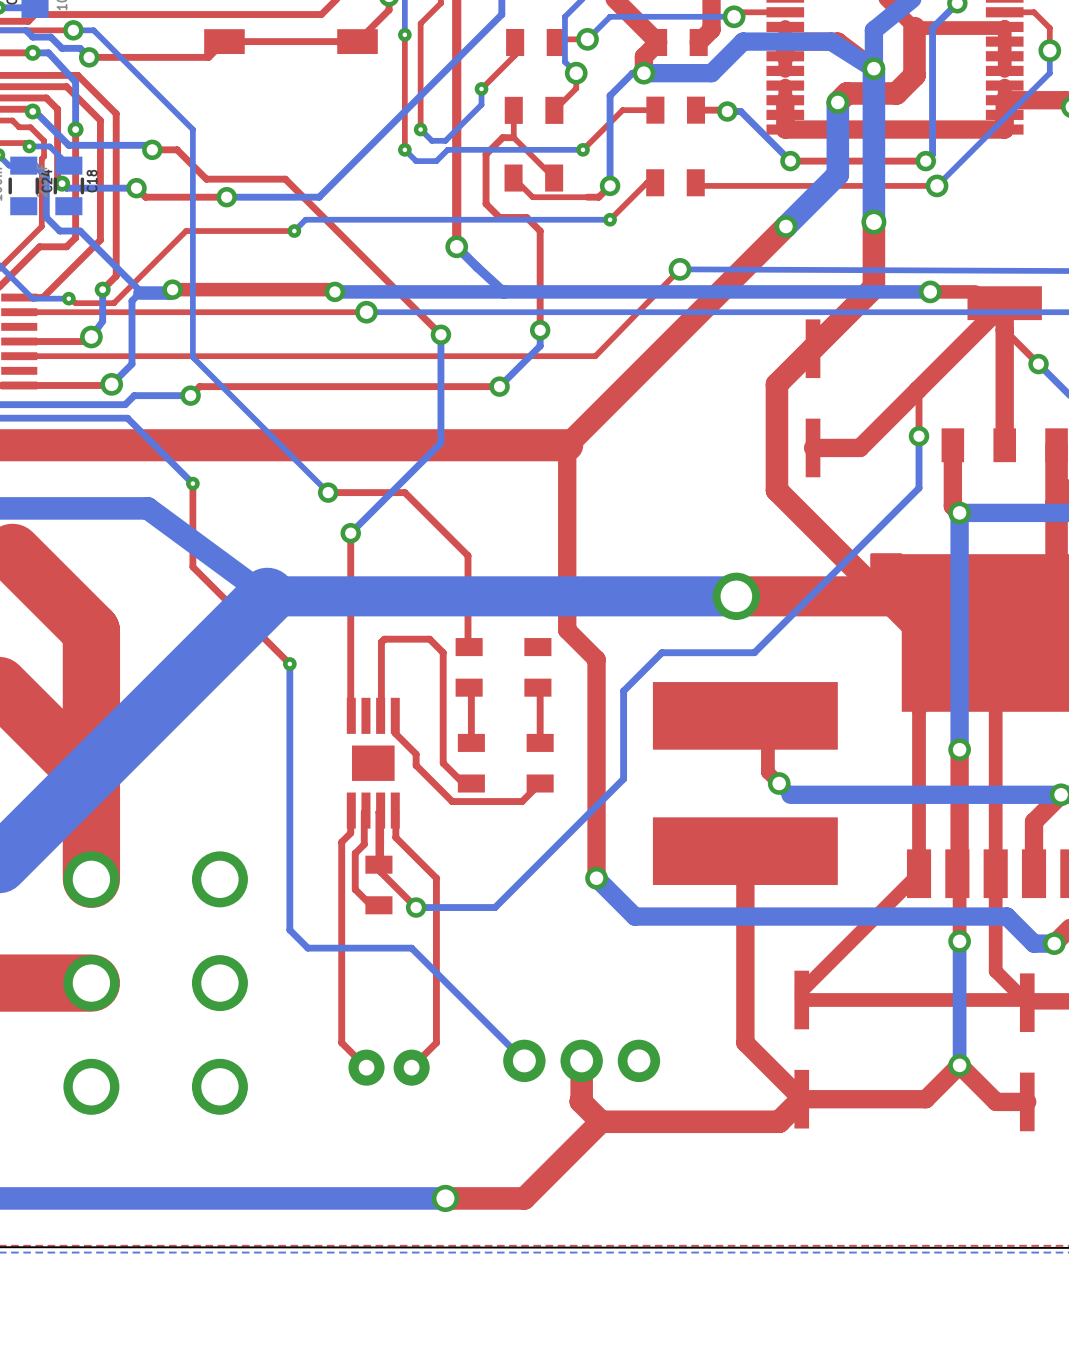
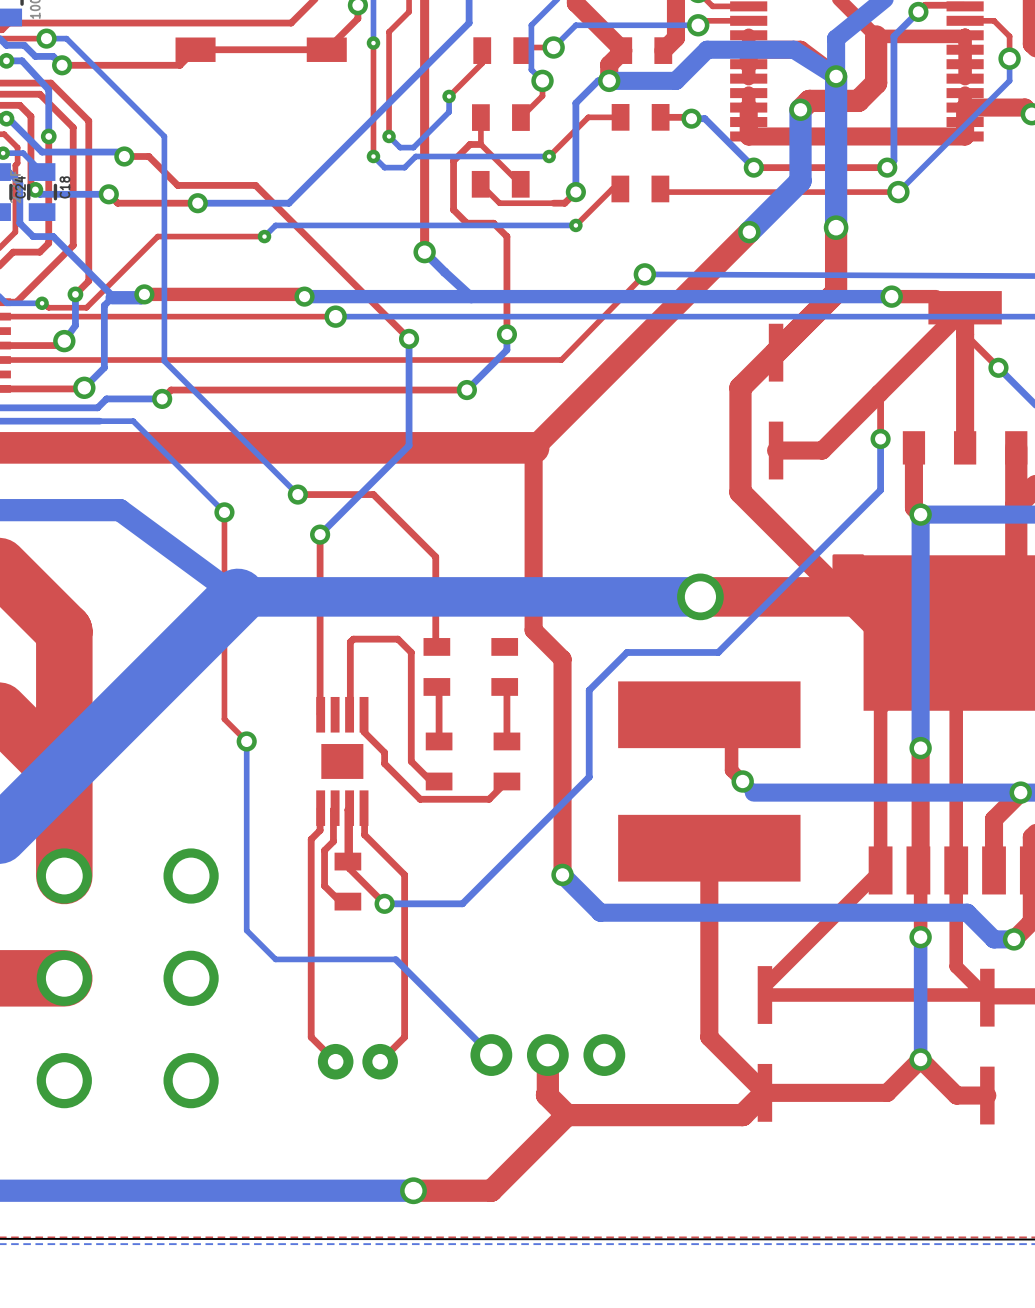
bottom track: (127, 418) (192, 483) -> (99, 421) (133, 421) (224, 512)
top track: (192, 483) (192, 567) (289, 663) -> none
via: (192, 483) -> none
top track: none -> (224, 512) (224, 719) (246, 741)
via: none -> (224, 512)
bottom track: (289, 663) (289, 930) (307, 948) (411, 948) (427, 963) -> (246, 741) (246, 930) (275, 959) (395, 959)
via: (289, 663) -> none
via: none -> (246, 741)

